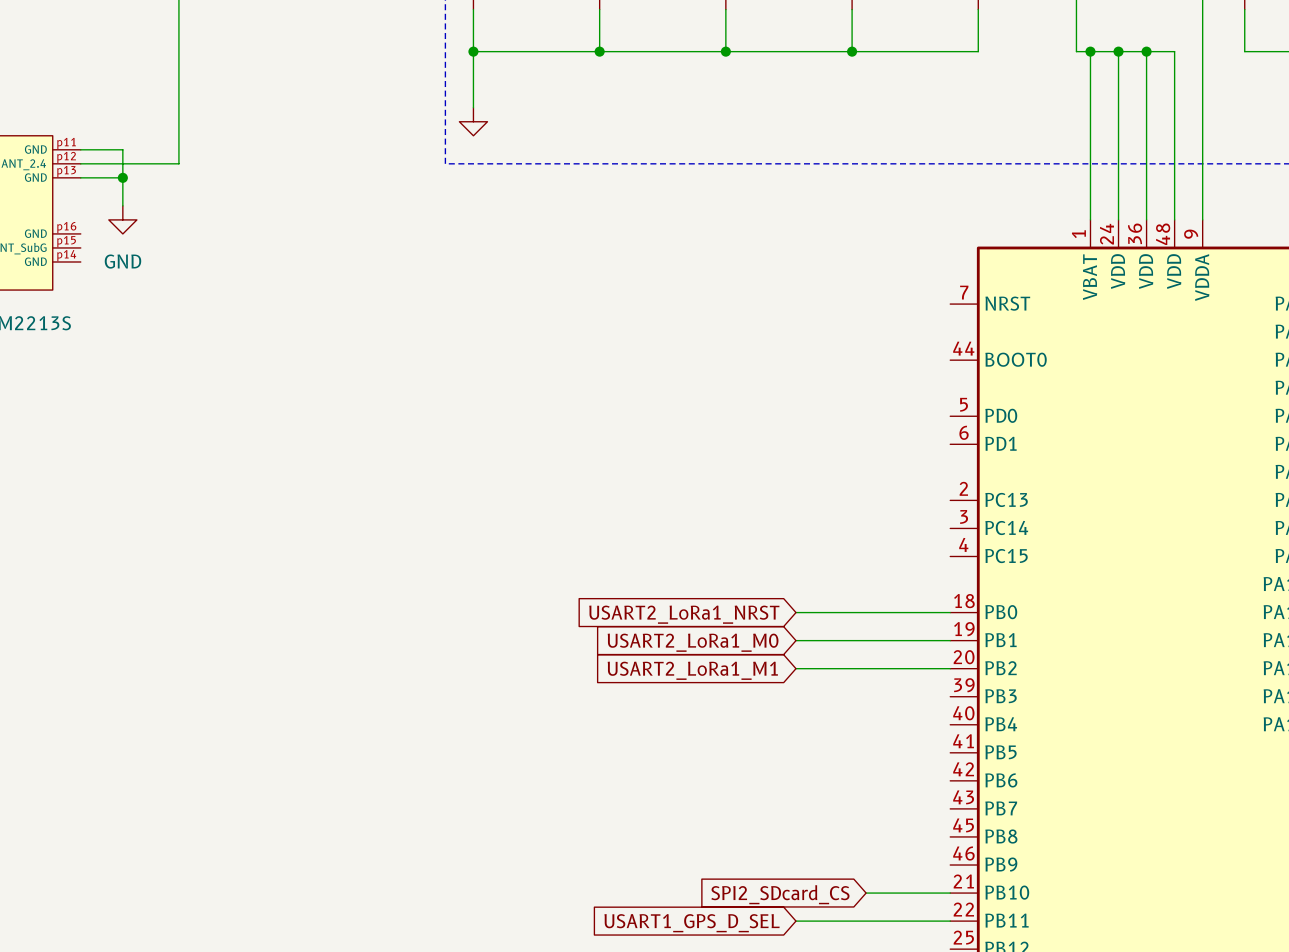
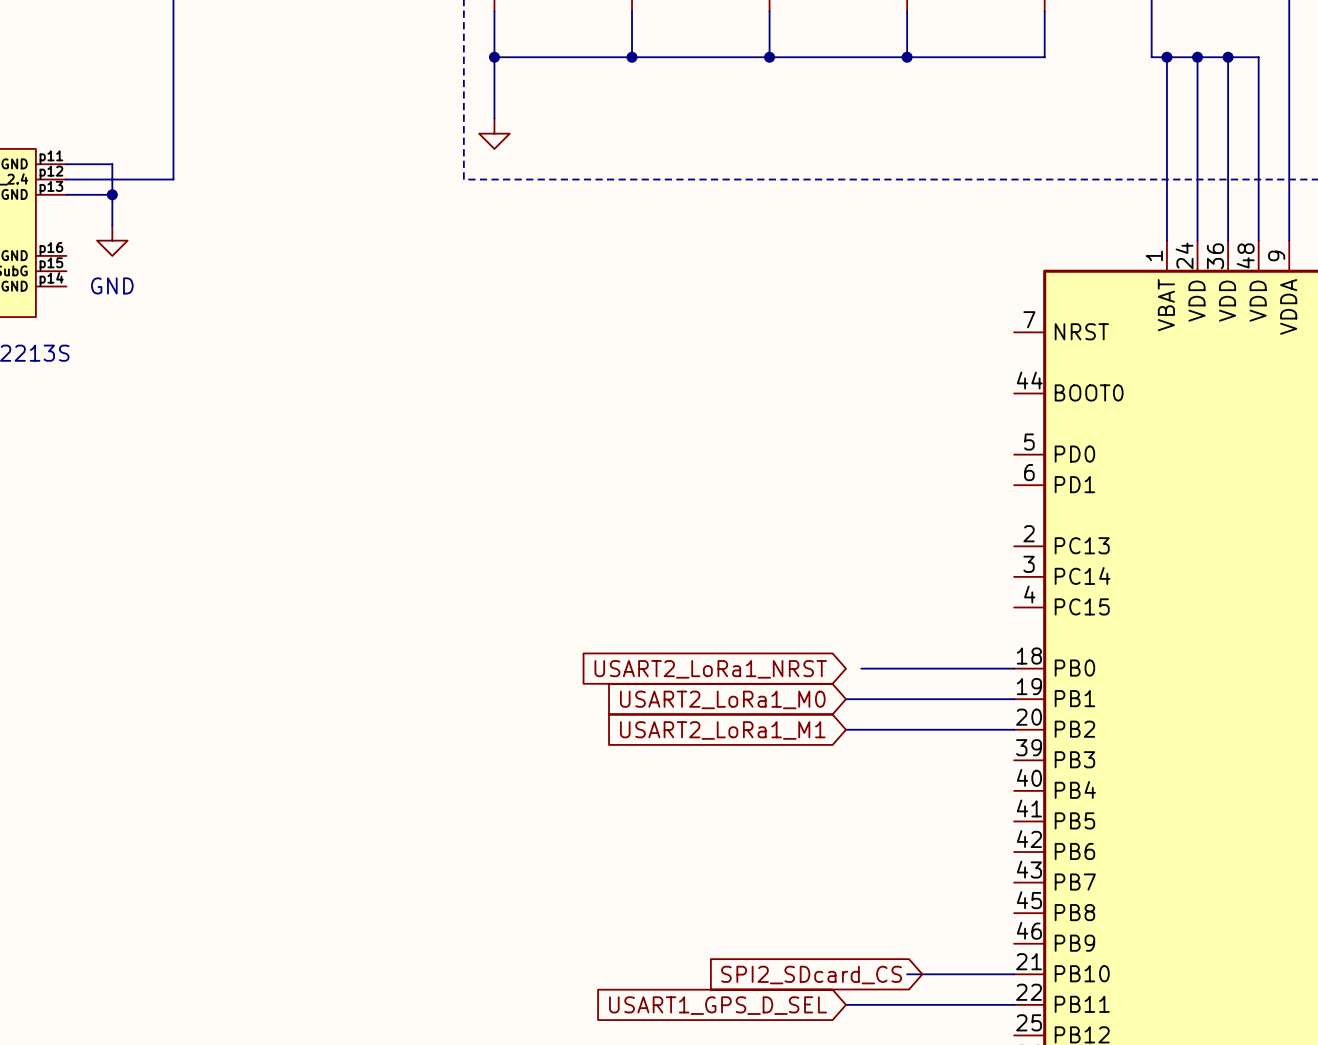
wire: (795, 612) (810, 612) -> none
wire: none -> (907, 974) (922, 974)

